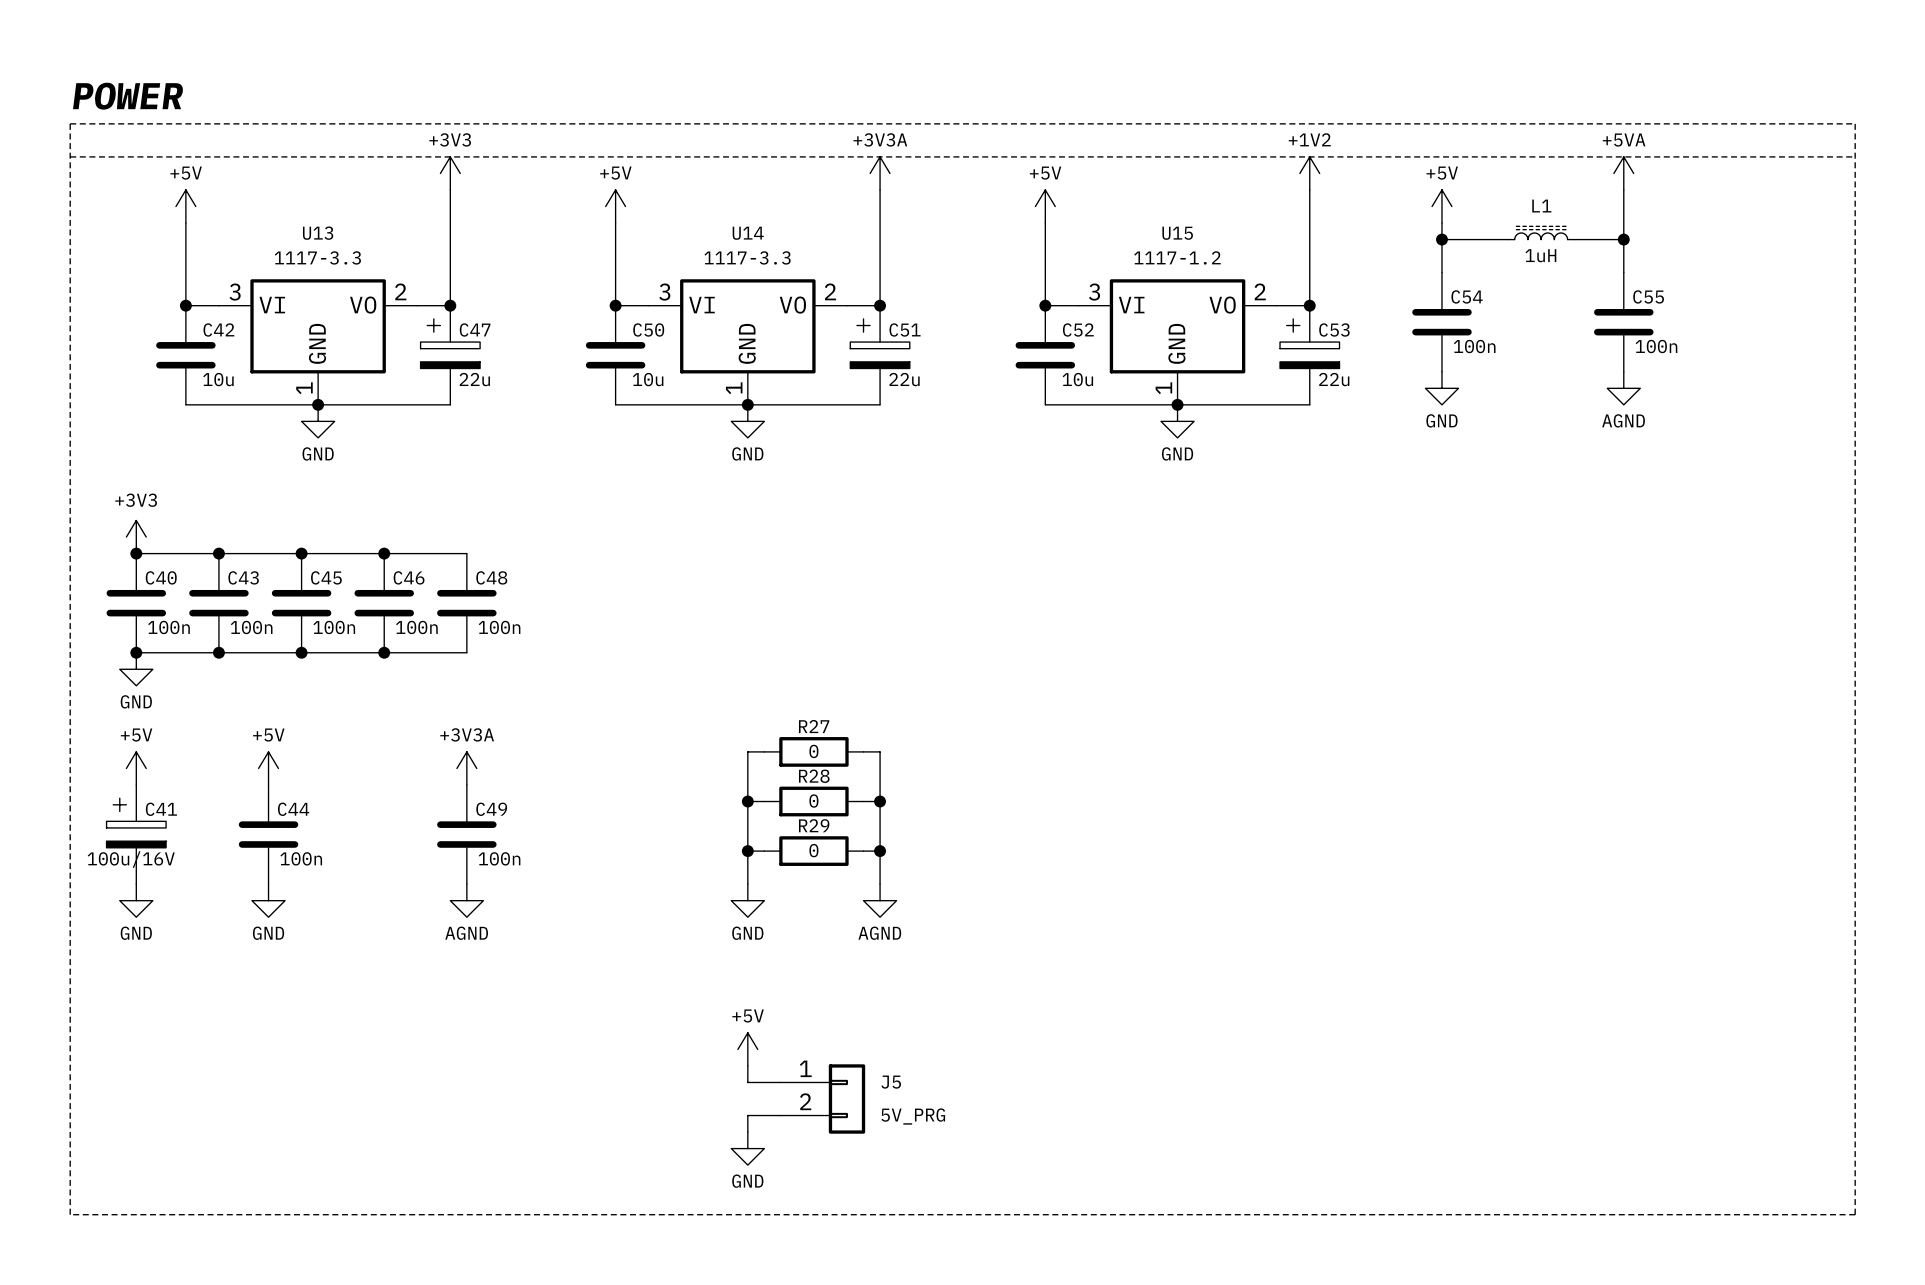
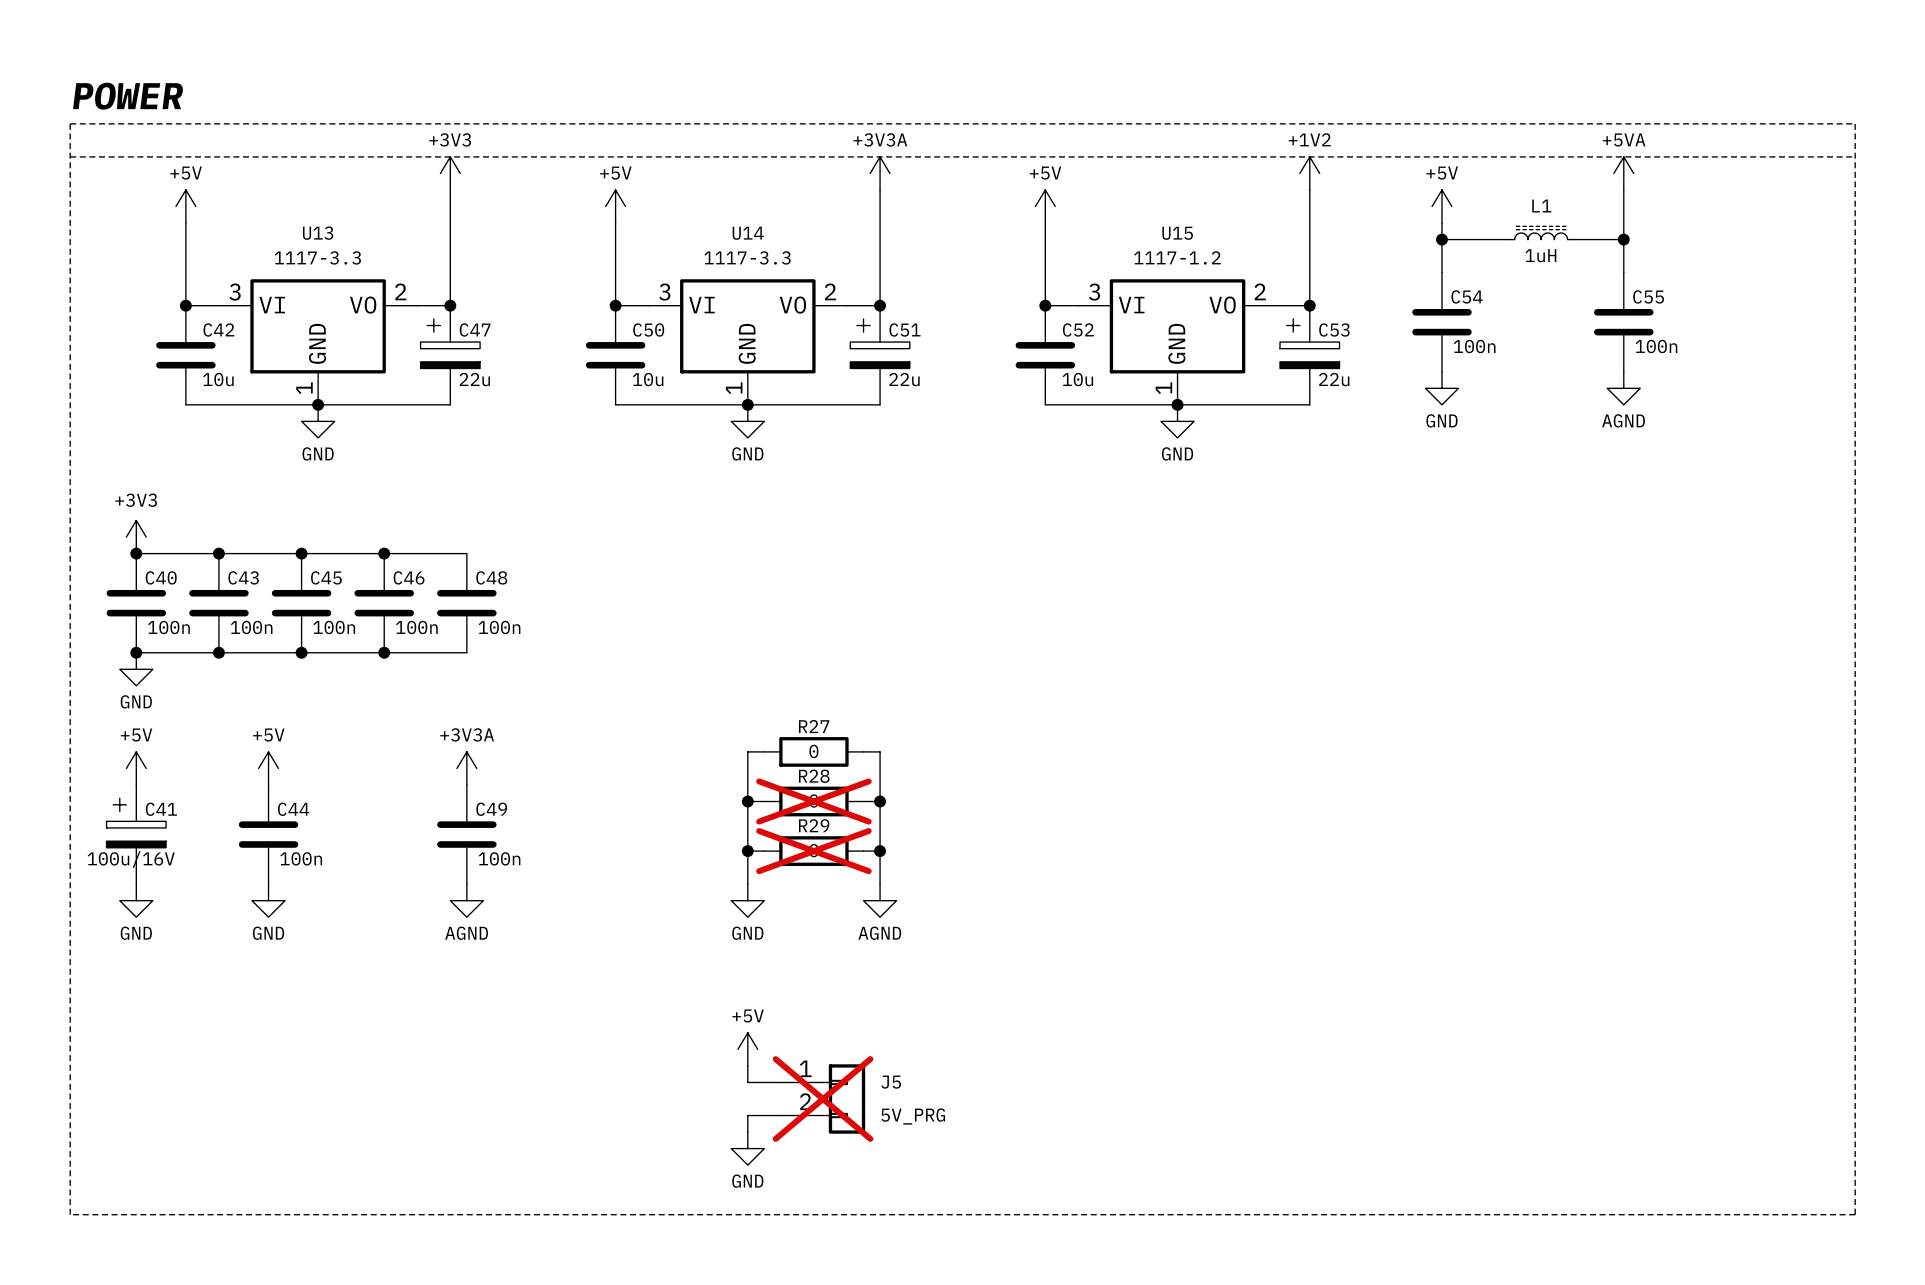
R28 do-not-place cross: none -> (813, 801)
R29 do-not-place cross: none -> (813, 851)
J5 do-not-place cross: none -> (823, 1099)

